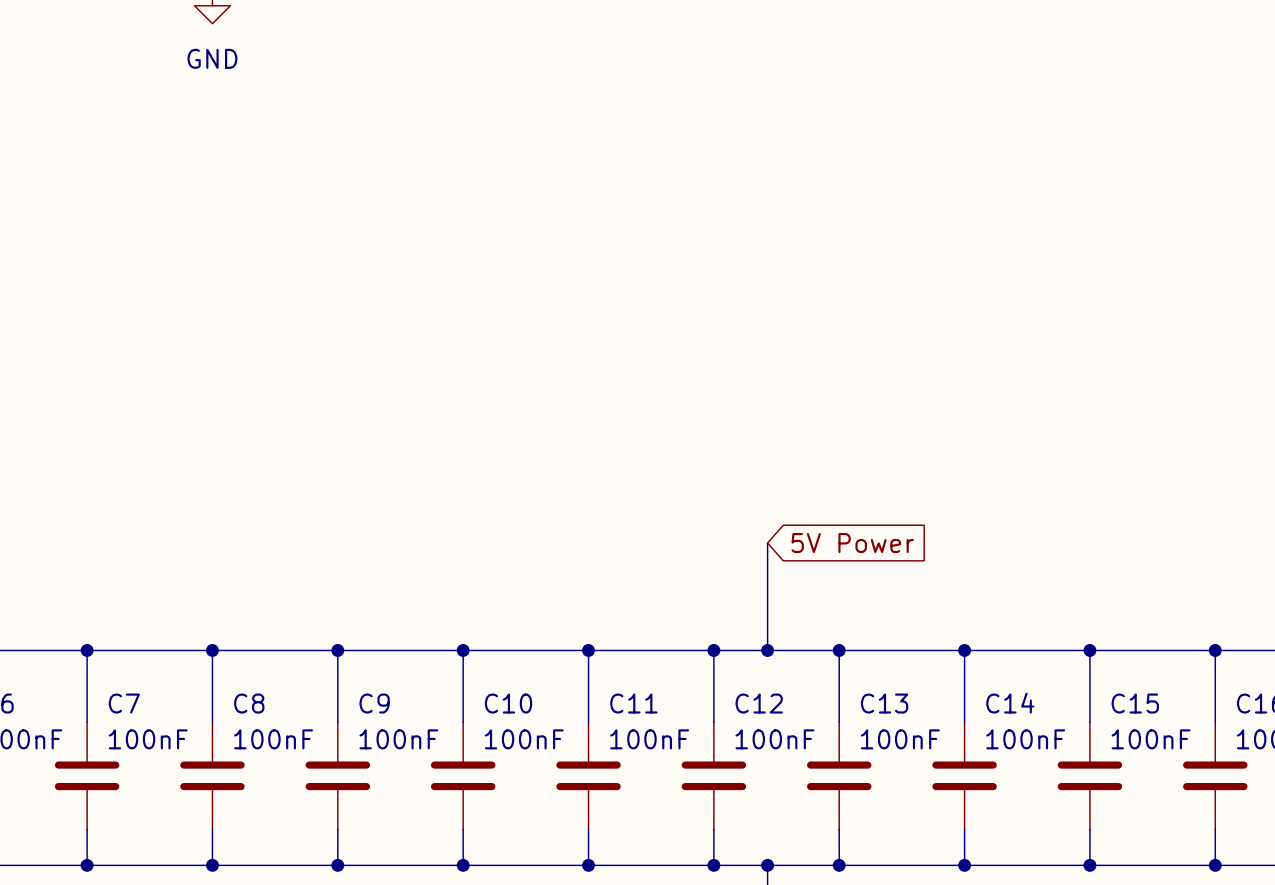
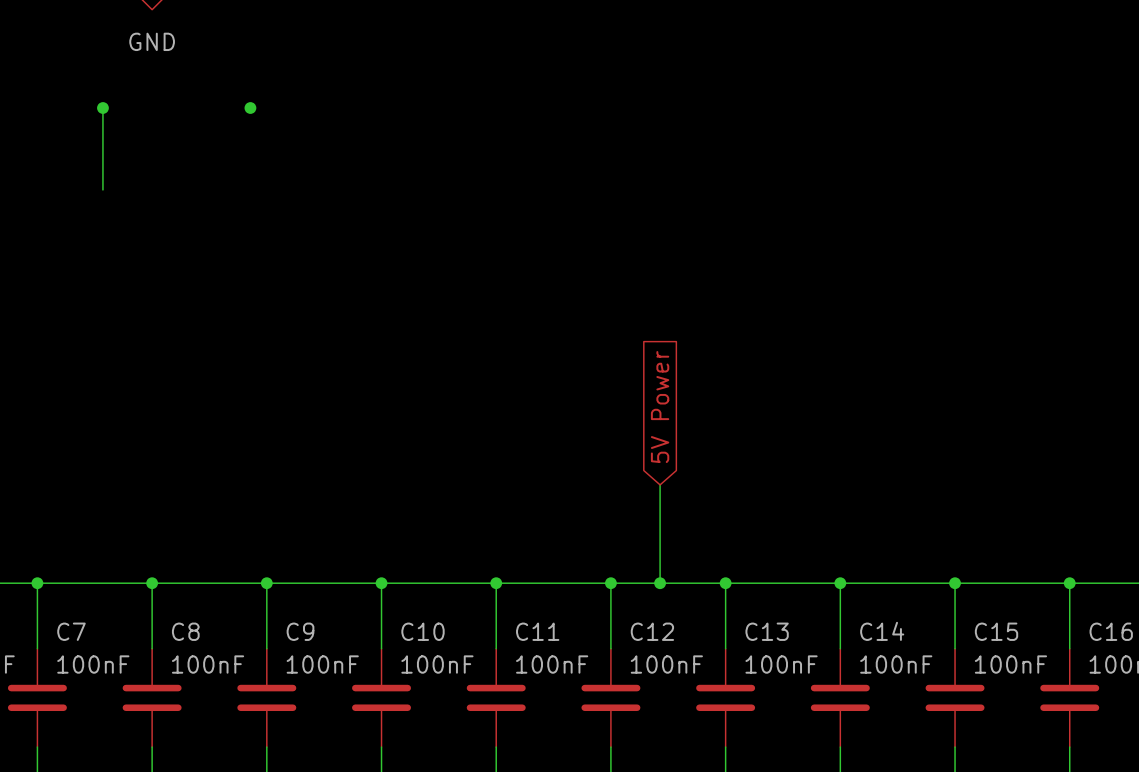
wire: none -> (102, 108) (102, 189)
junction: none -> (102, 108)
junction: none -> (250, 108)
global label rotation: 0° (852, 543) -> 90° counterclockwise (660, 407)

